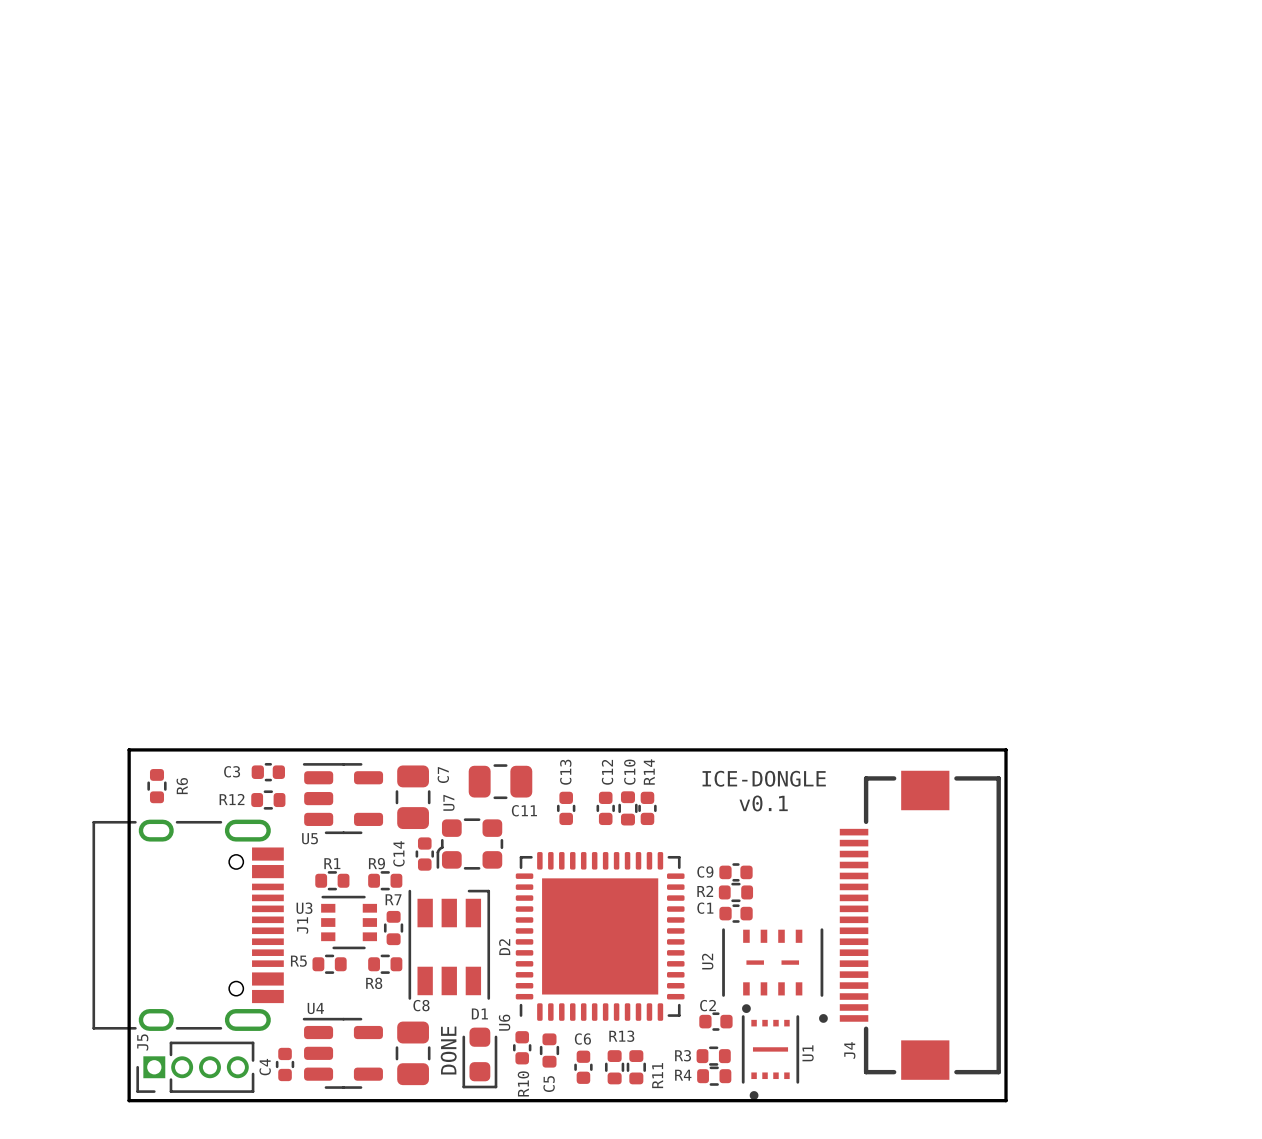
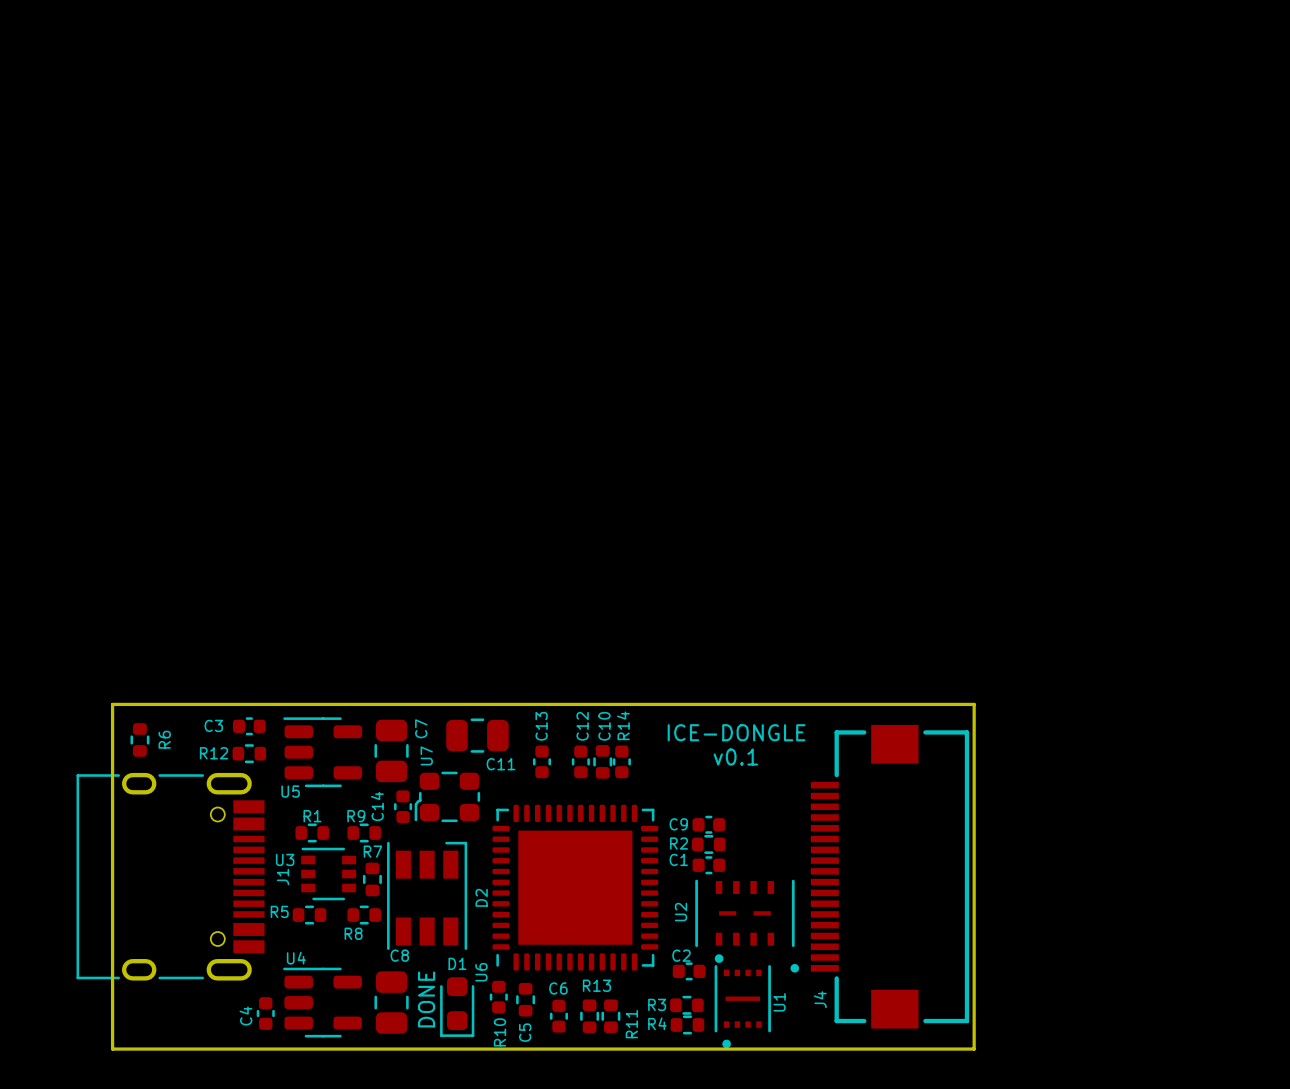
J5: (195, 1067) -> none

